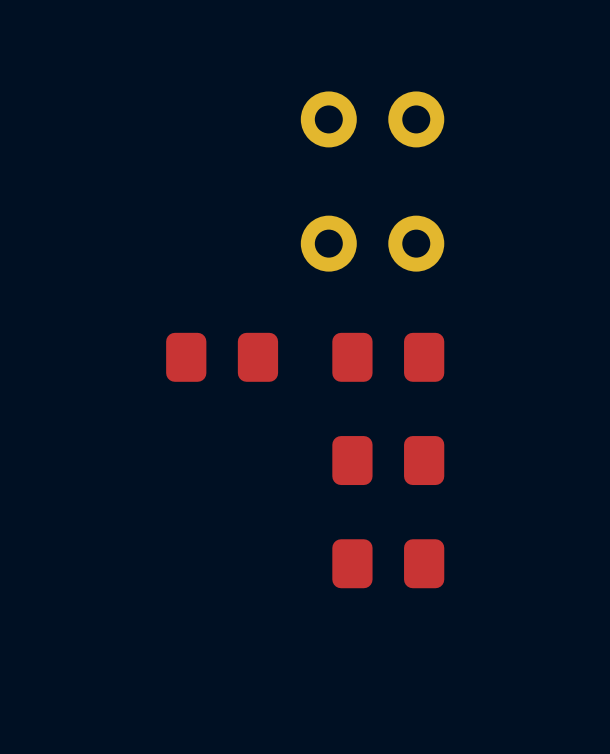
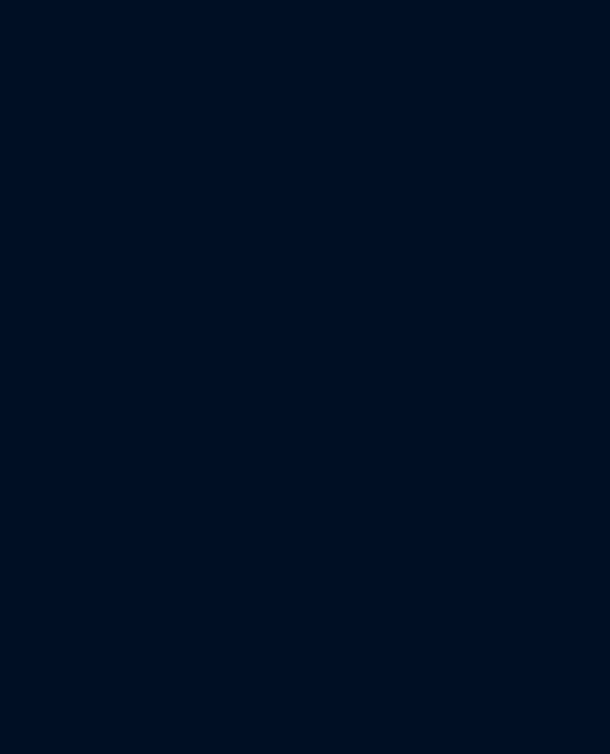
part: (372, 119) -> none
part: (372, 243) -> none
part: (222, 357) -> none
part: (388, 357) -> none
part: (388, 460) -> none
part: (388, 563) -> none

